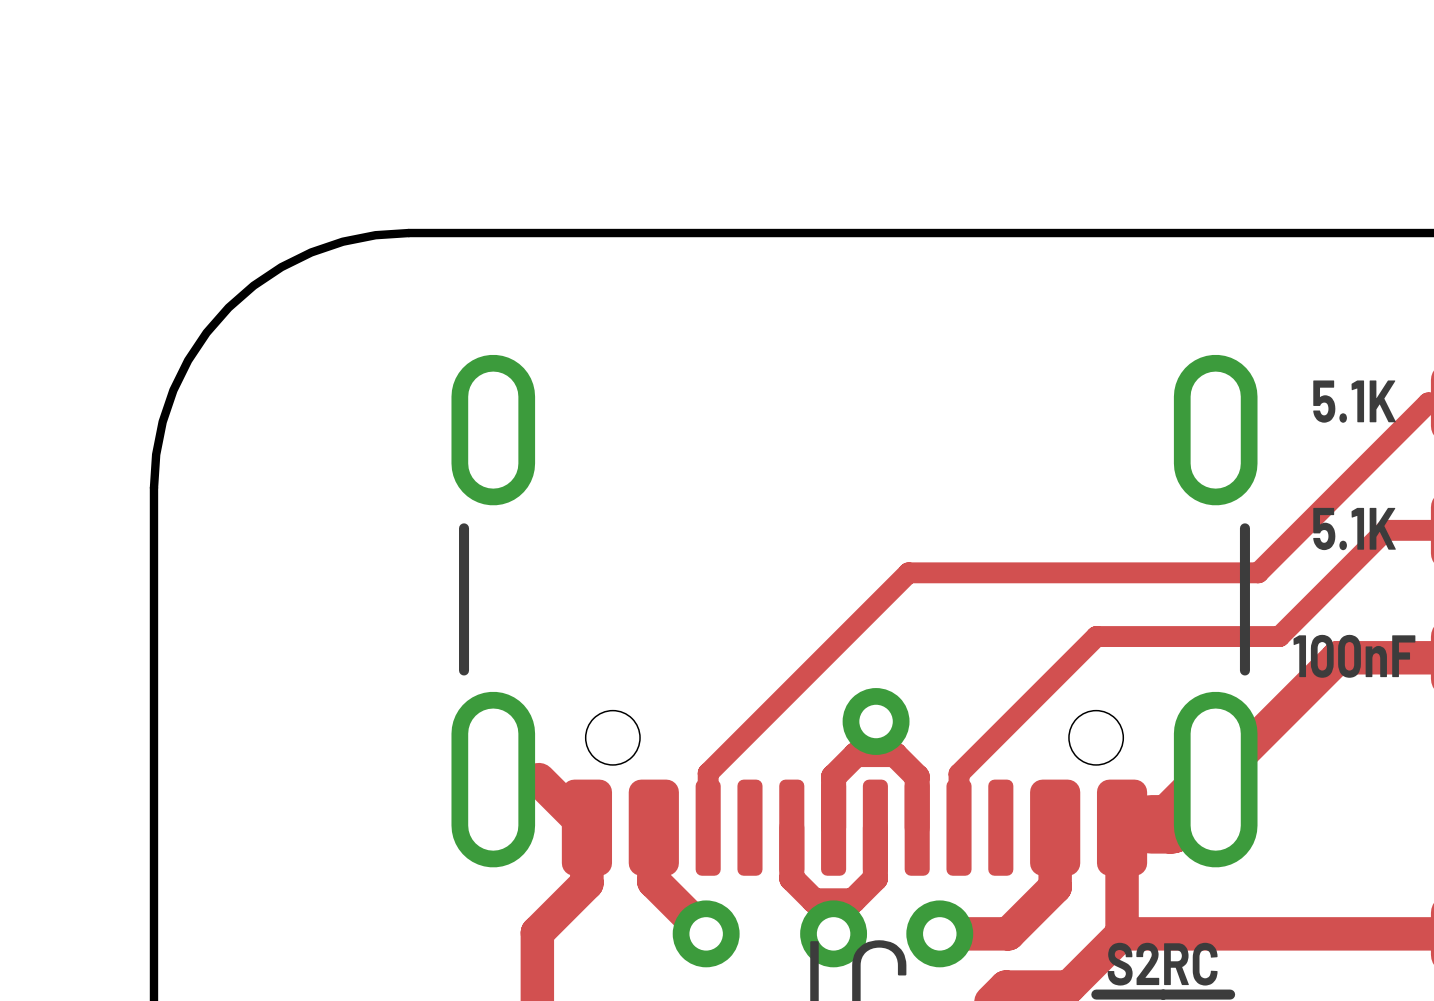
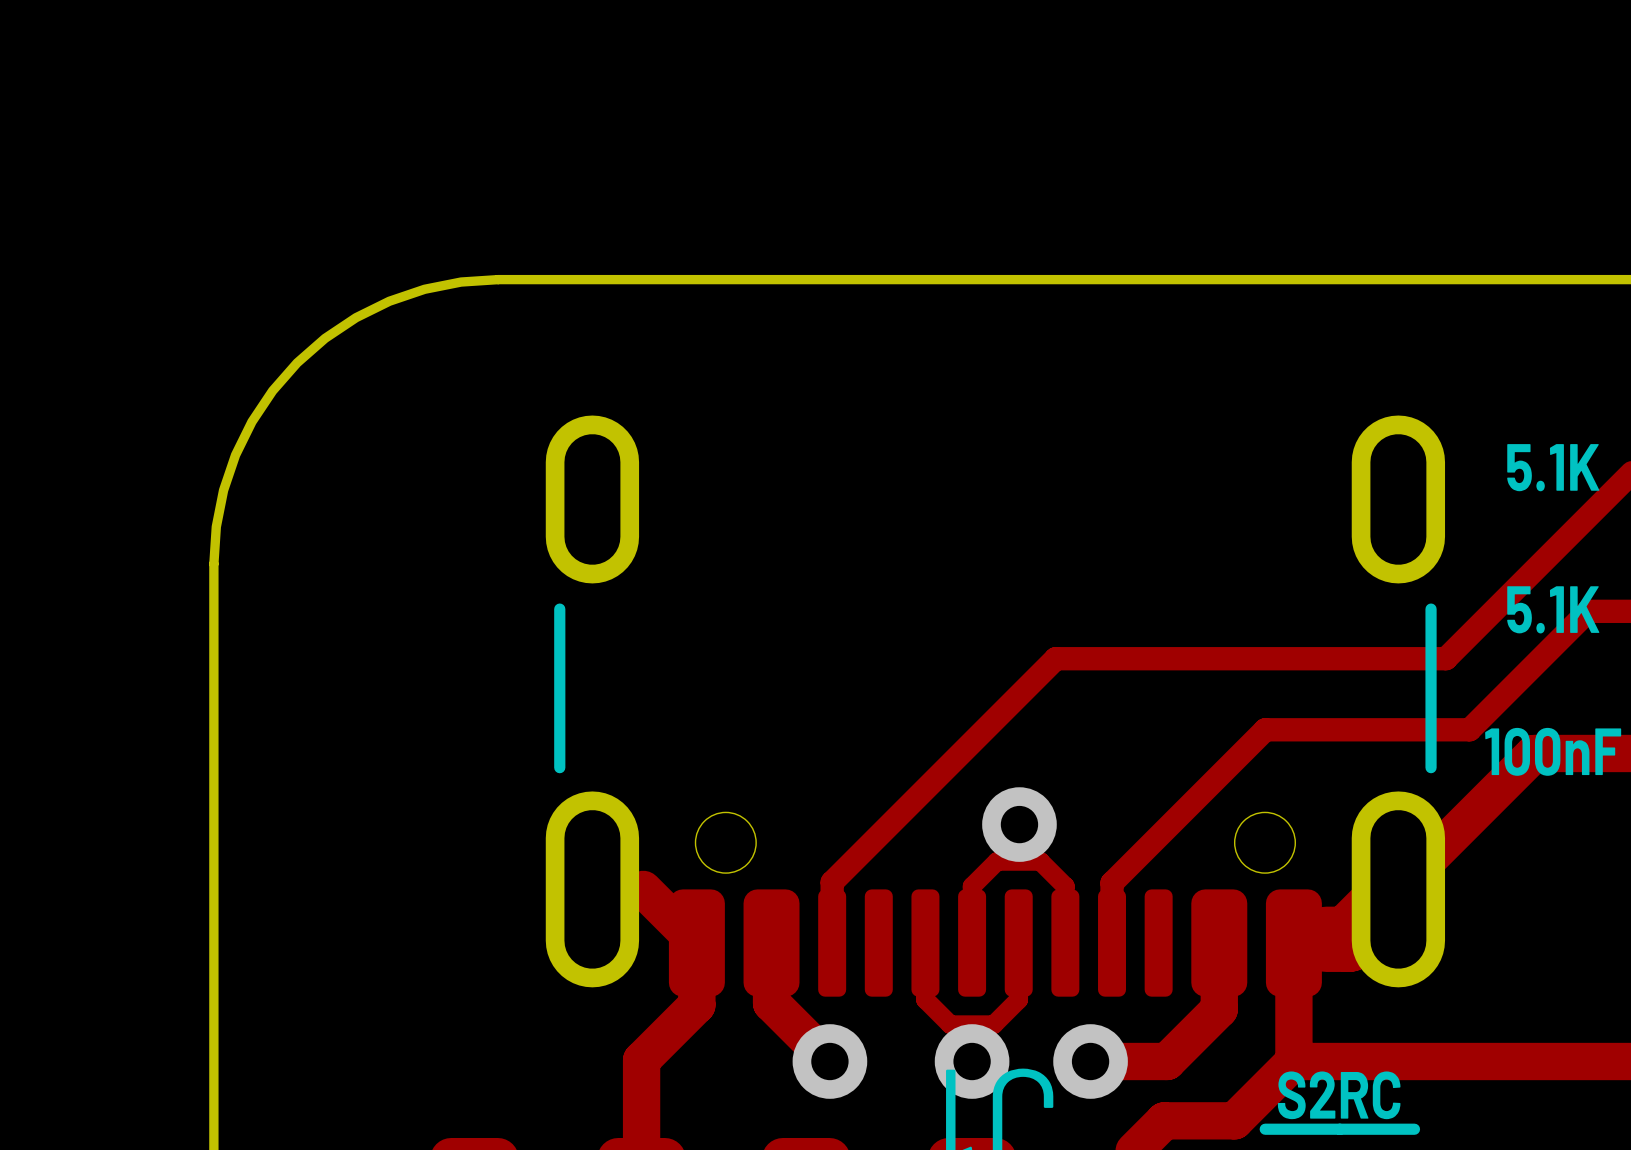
track width: thick (791, 827) (791, 878) (814, 900) (853, 900) (875, 878) (875, 827) -> thin (925, 943) (925, 999) (950, 1024) (993, 1024) (1018, 999) (1018, 943)
track width: thick (833, 827) (833, 776) (855, 754) (894, 754) (917, 776) (917, 827) -> thin (972, 943) (972, 886) (997, 861) (1040, 861) (1065, 886) (1065, 943)

